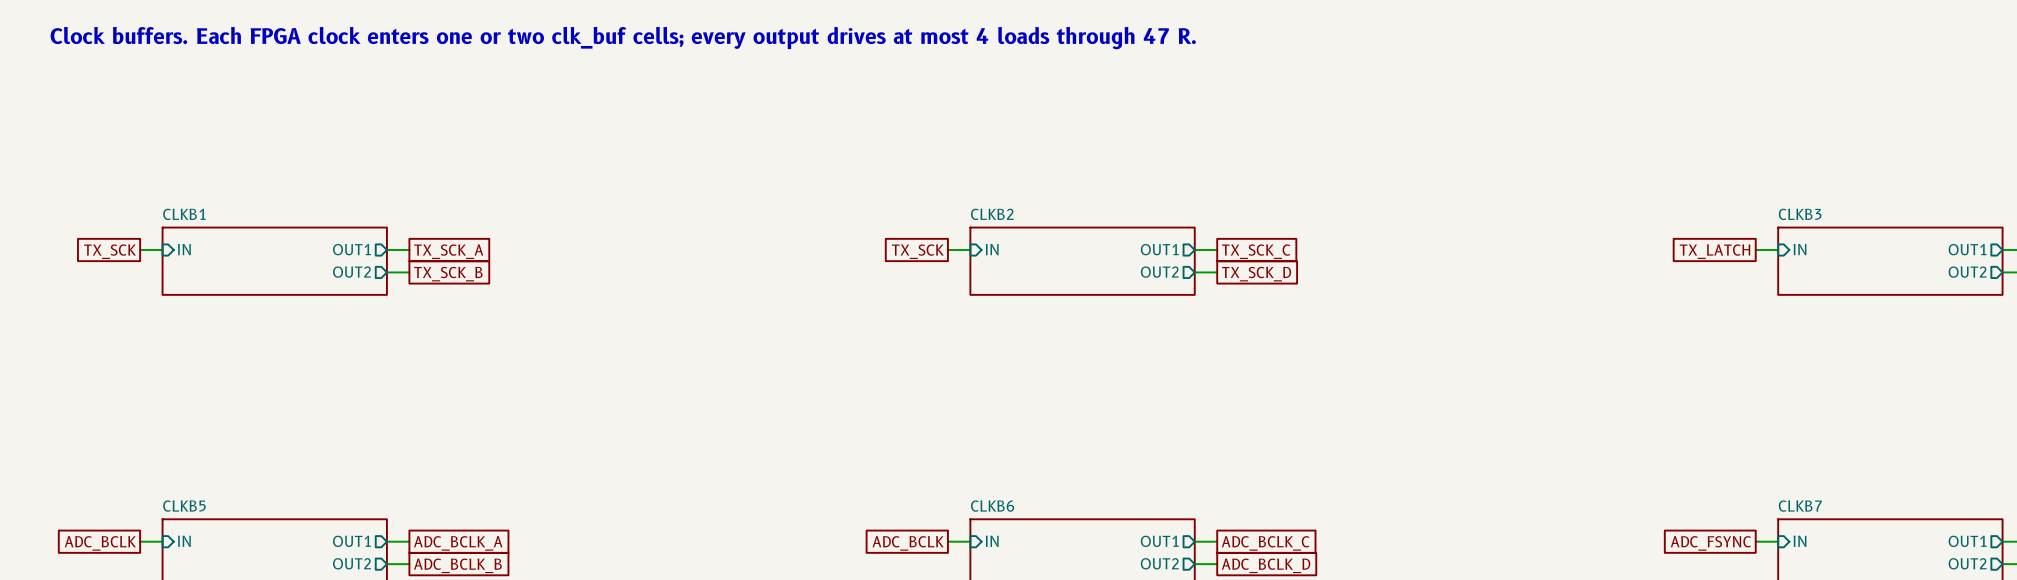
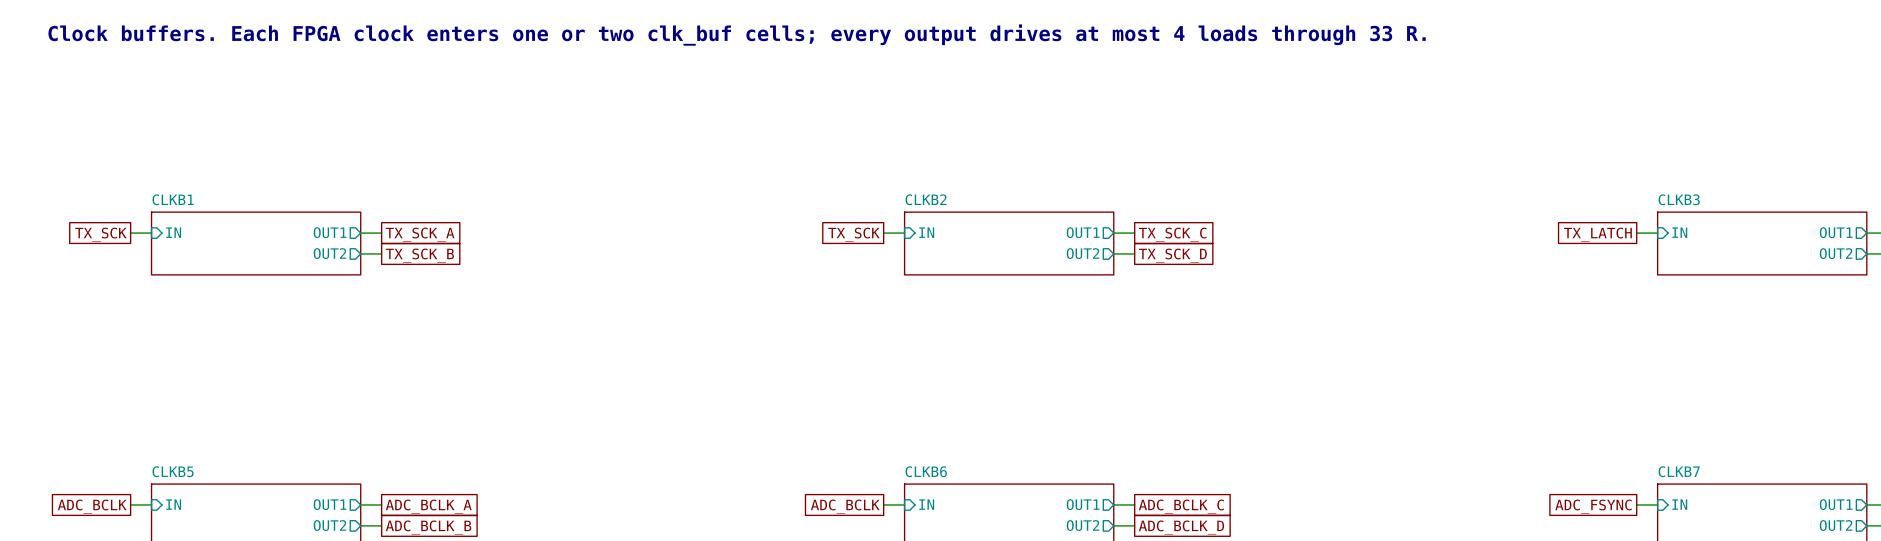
text: Clock buffers. Each FPGA clock enters one or two clk_buf cells; every output drives at most 4 loads through 47 R. (623, 38) -> Clock buffers. Each FPGA clock enters one or two clk_buf cells; every output drives at most 4 loads through 33 R. (737, 35)

